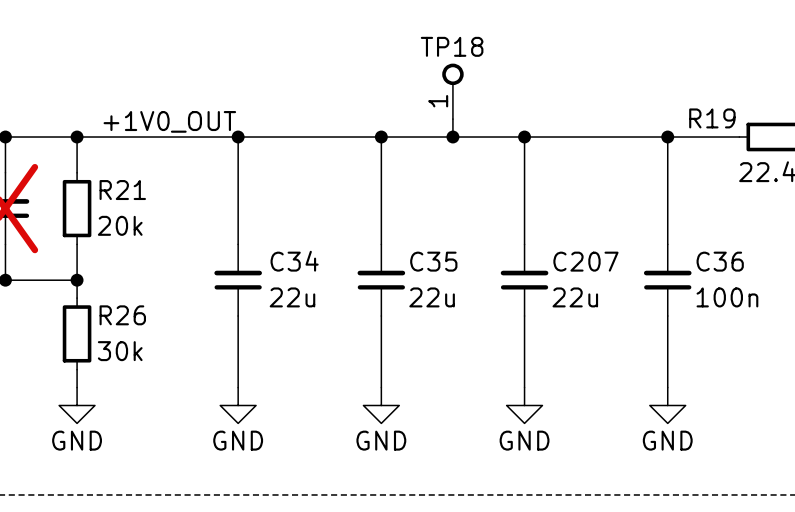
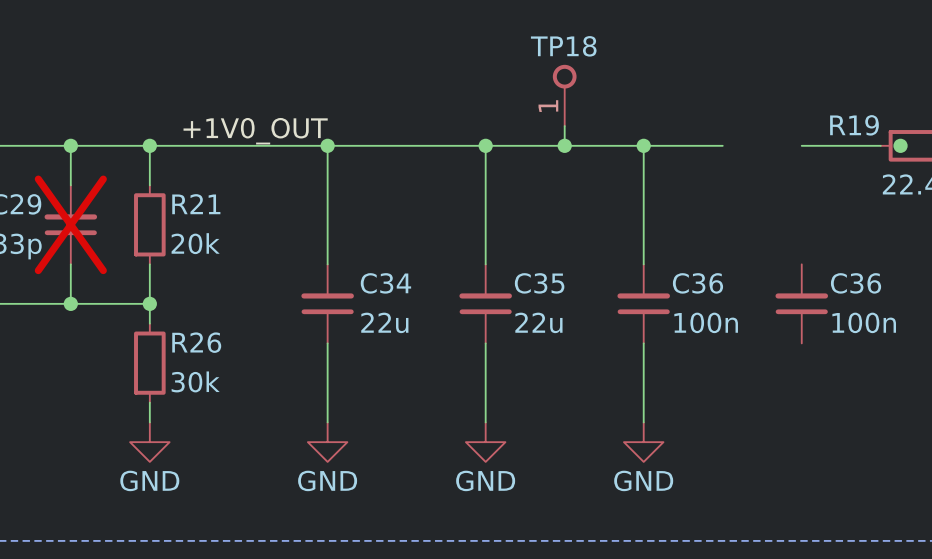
wire: (596, 137) (667, 137) (667, 244) -> none
junction: (667, 137) -> none
junction: none -> (900, 145)
C207 name: C207 (585, 261) -> C36 (697, 283)
C207 text: 22u (575, 297) -> 100n (706, 322)
wire: (667, 316) (667, 387) -> none
power symbol: GND (667, 405) -> none

